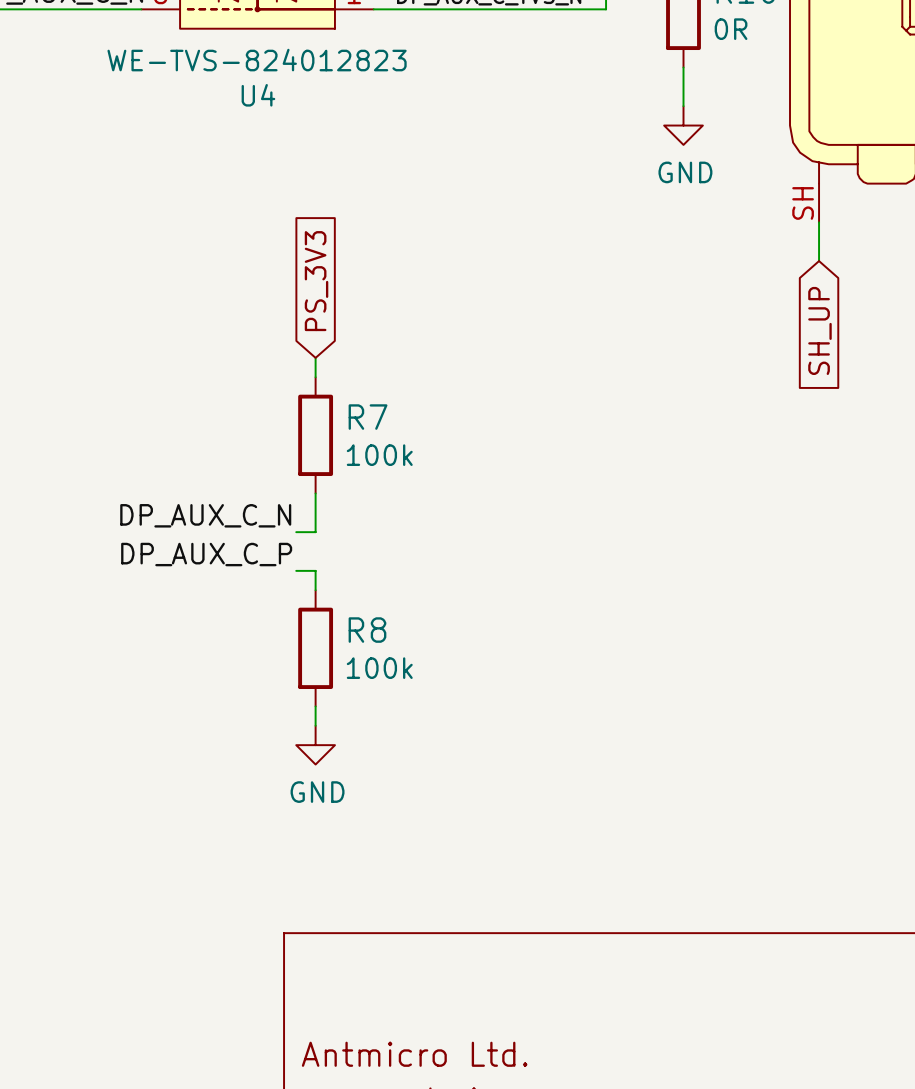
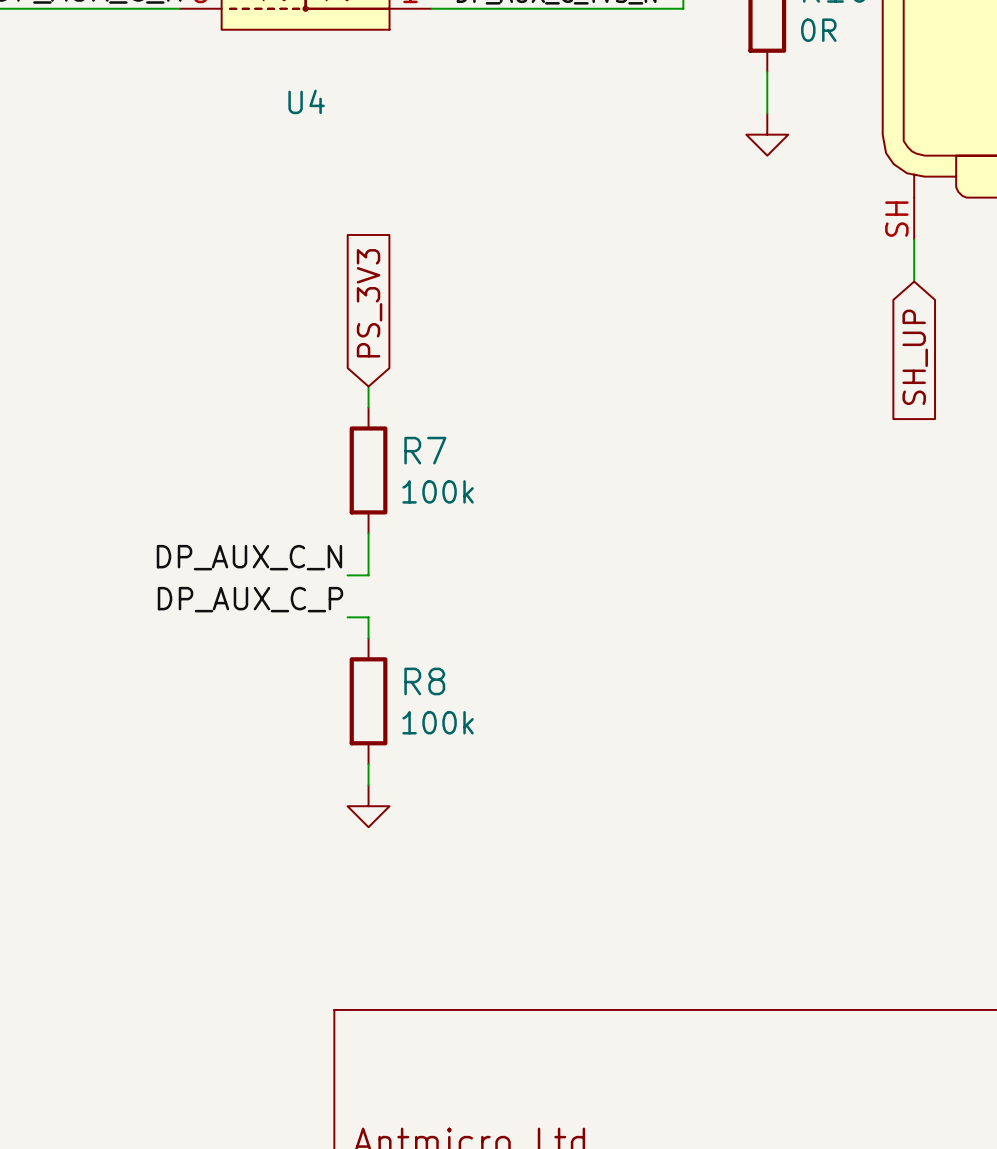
U4 value: WE-TVS-824012823 (257, 60) -> none
power symbol text: GND (685, 172) -> none
power symbol text: GND (317, 792) -> none

